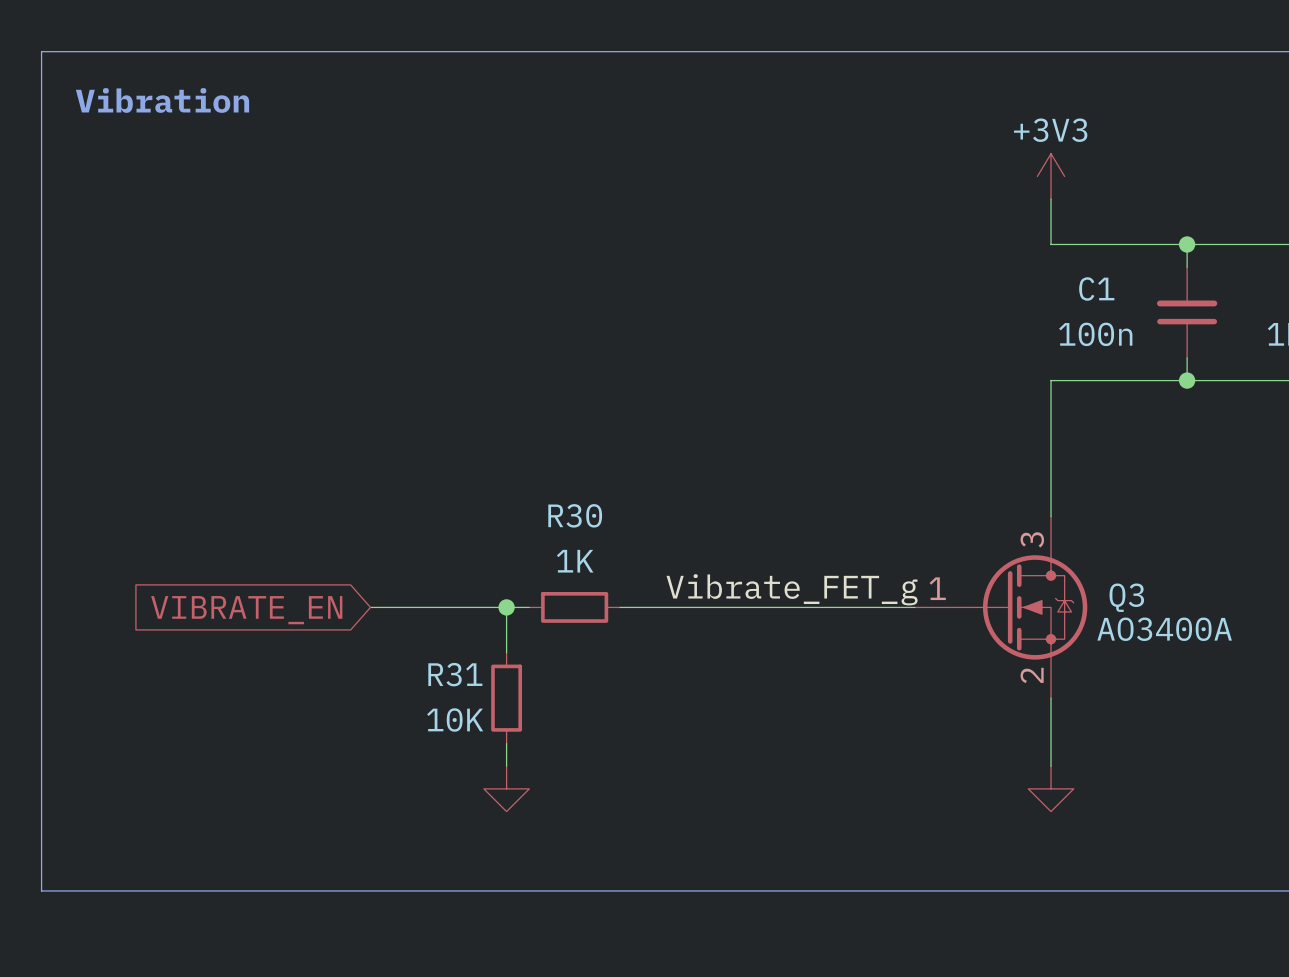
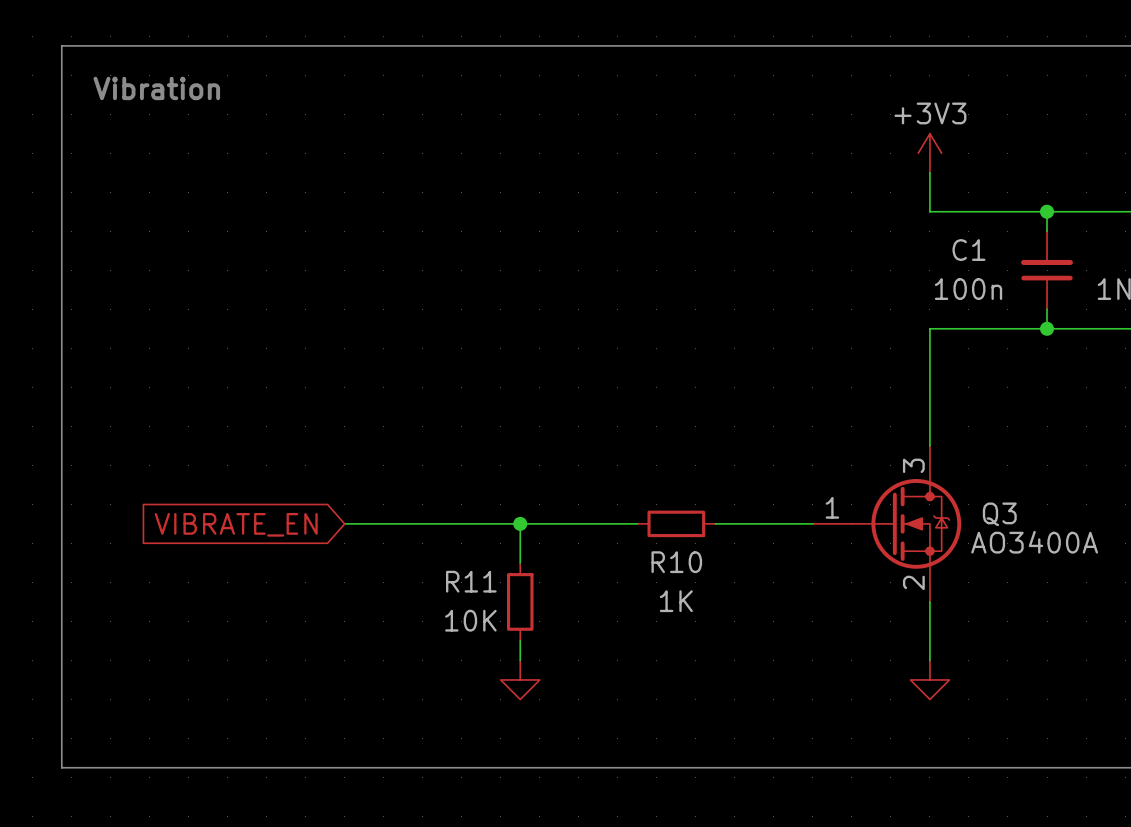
label: Vibrate_FET_g (792, 589) -> none
wire: (506, 607) (506, 652) -> (520, 523) (520, 562)
junction position: (506, 607) -> (520, 523)
R30: 1K (574, 607) -> none
wire: (710, 607) (801, 607) -> (481, 523) (559, 523)
R10: none -> 1K (676, 523)
R31: 10K (506, 698) -> none
R11: none -> 10K (520, 601)
wire: (506, 743) (506, 766) -> (520, 640) (520, 660)
power symbol position: (506, 788) -> (520, 679)

